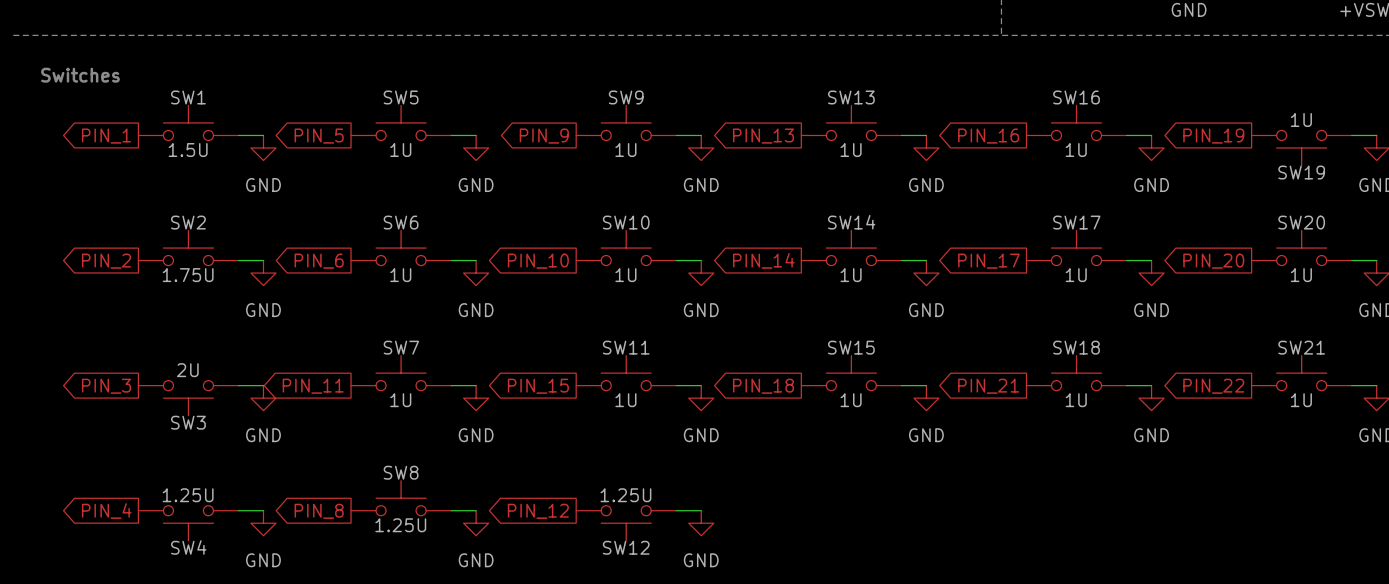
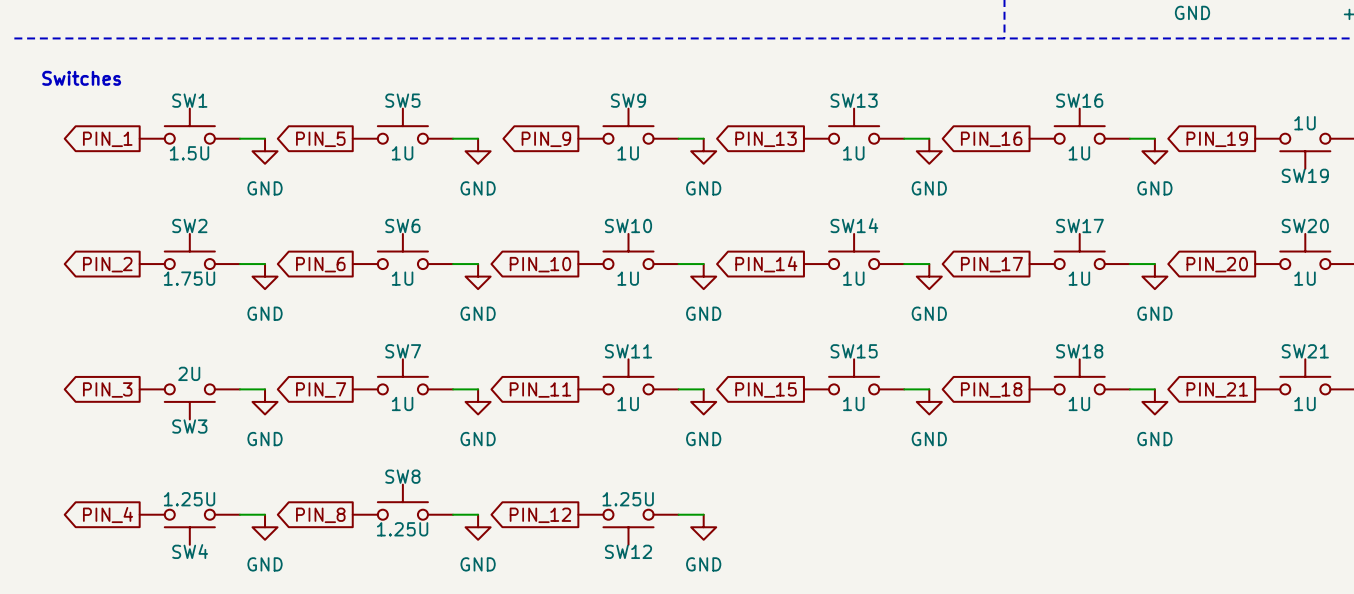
global label: PIN_11 (313, 386) -> PIN_7 (321, 389)
global label: PIN_15 (538, 386) -> PIN_11 (540, 389)
global label: PIN_18 (763, 386) -> PIN_15 (766, 389)
global label: PIN_21 (988, 386) -> PIN_18 (991, 389)
global label: PIN_22 (1213, 386) -> PIN_21 (1217, 389)

